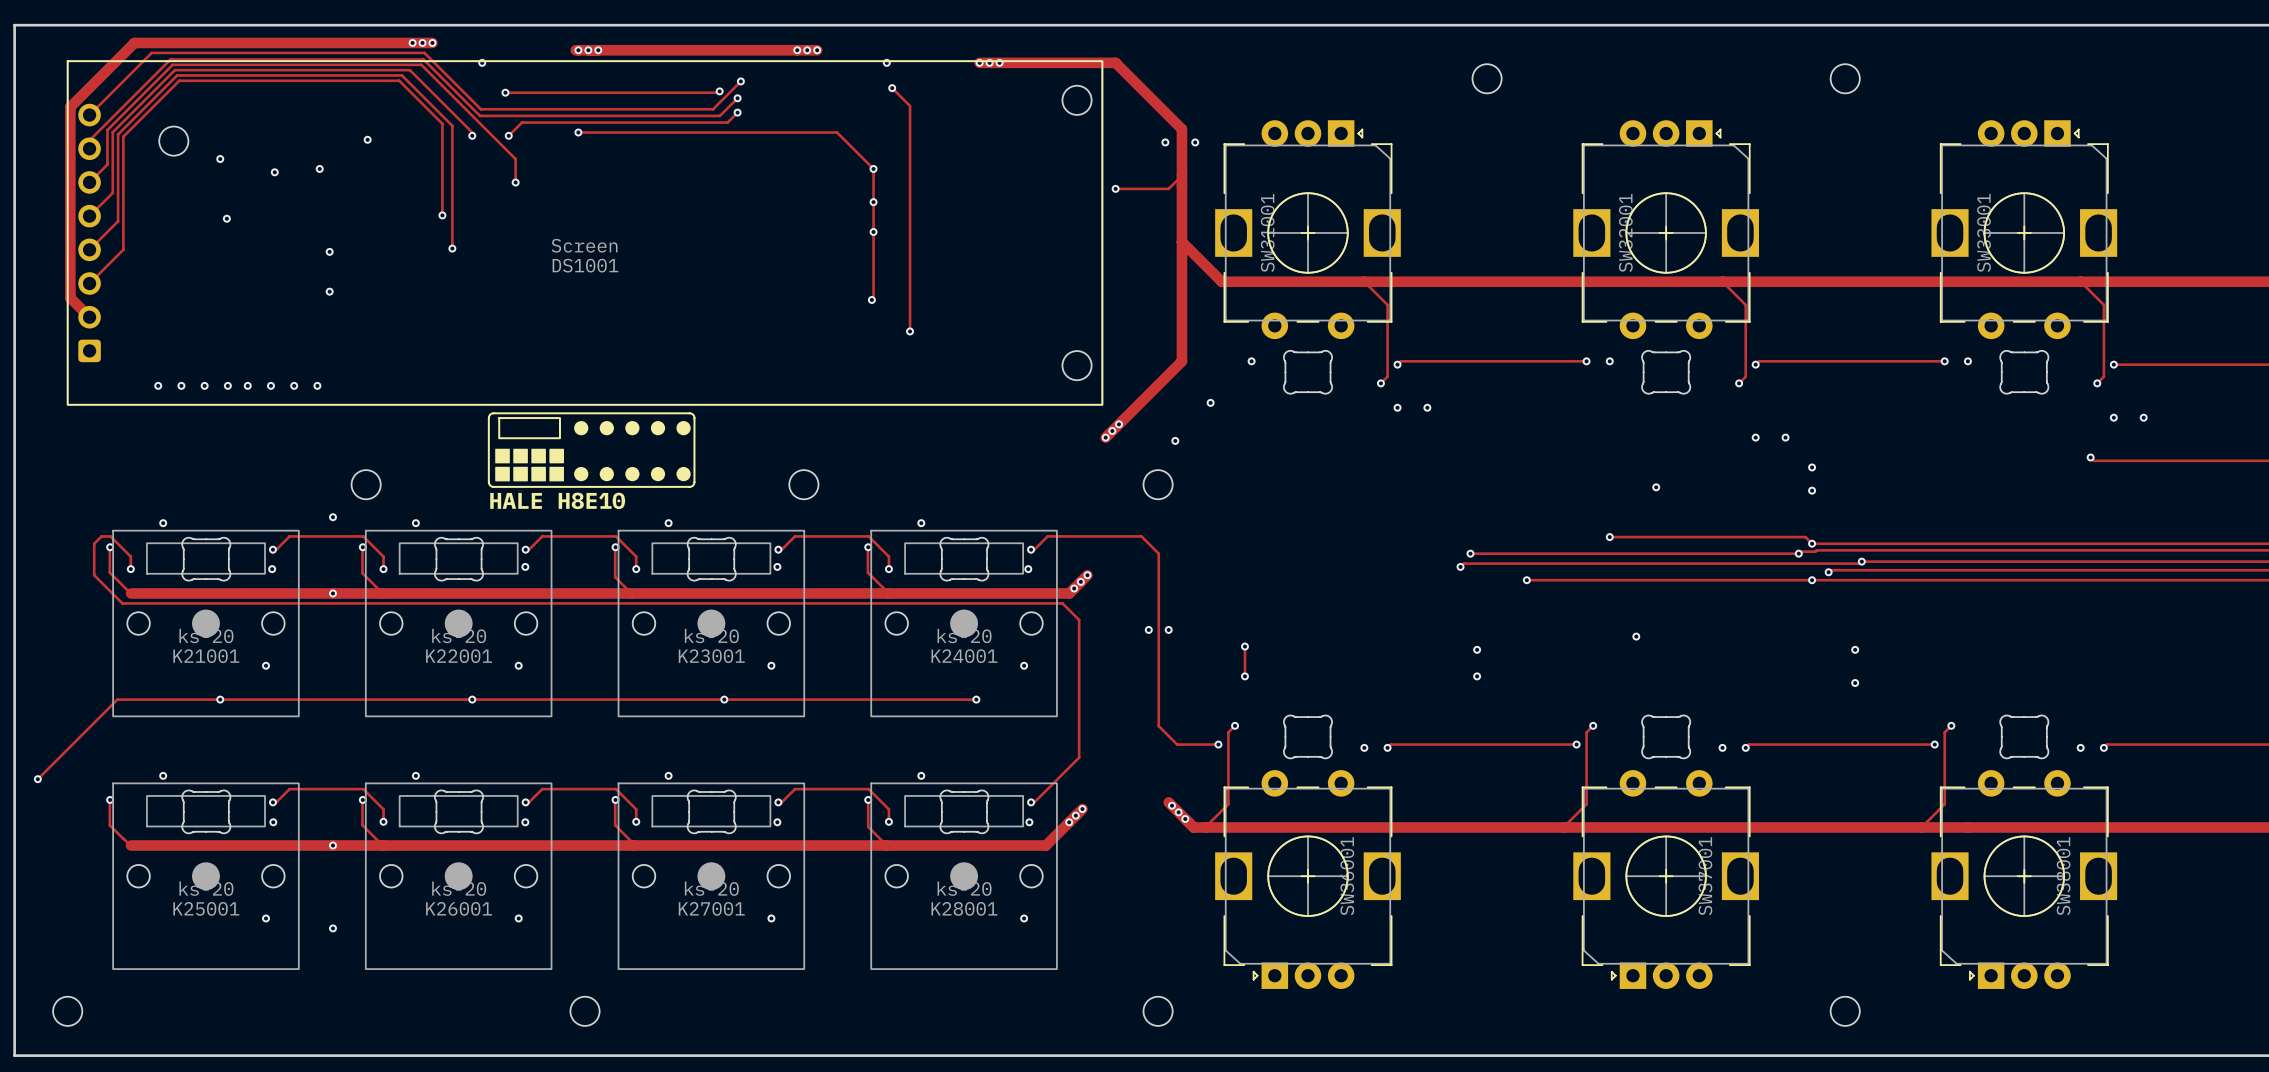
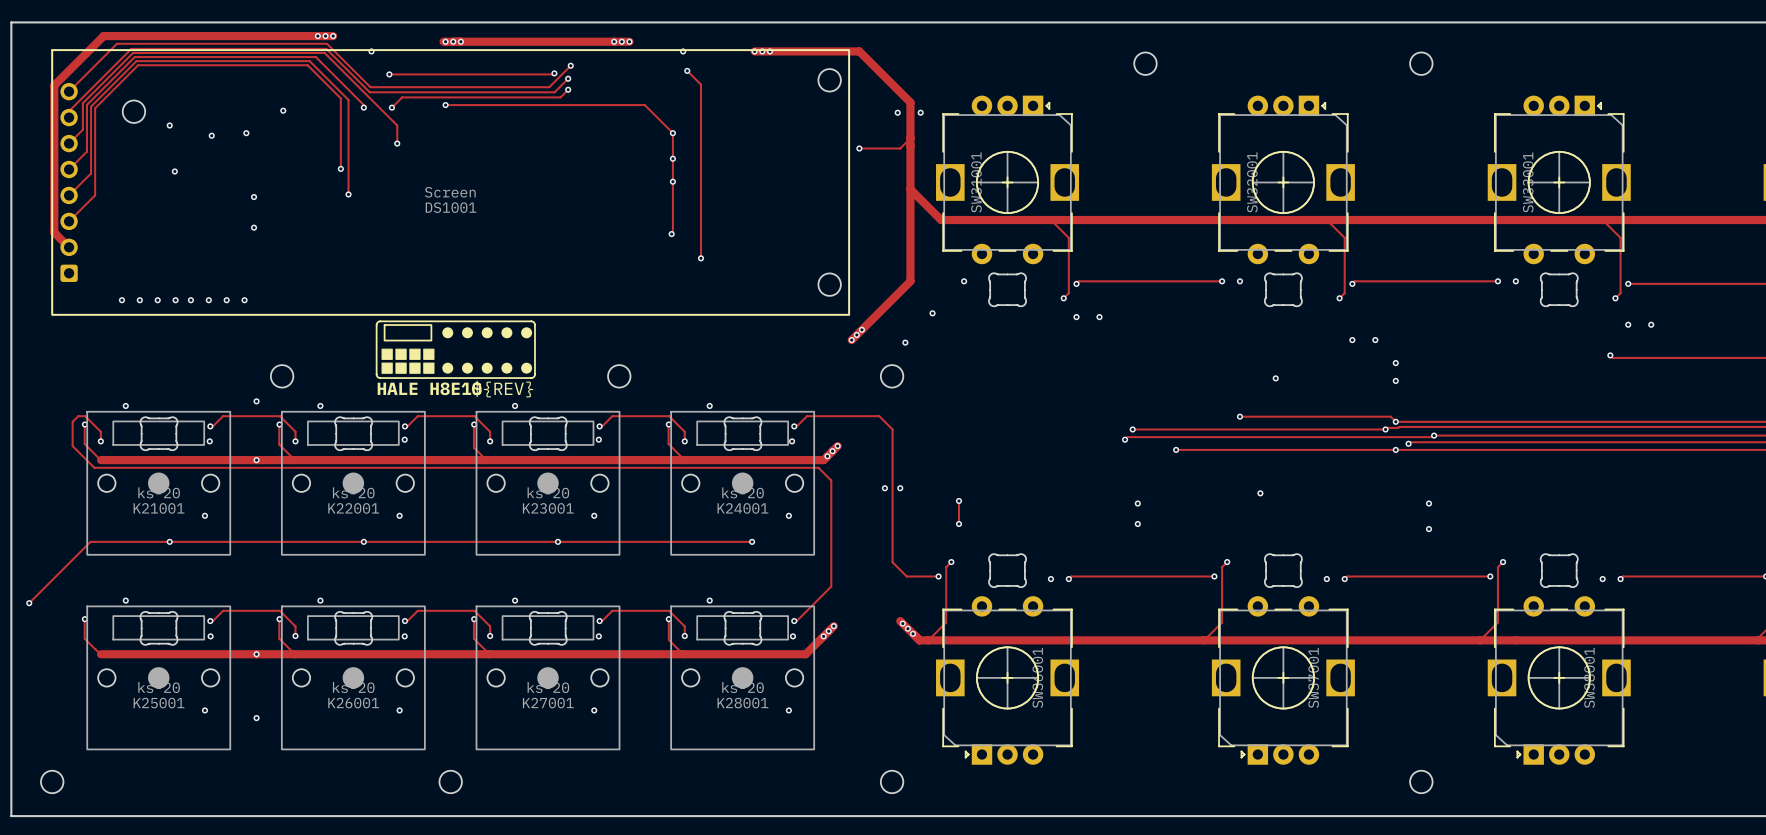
drawing shape: [487, 412, 696, 510] -> [375, 320, 536, 398]

